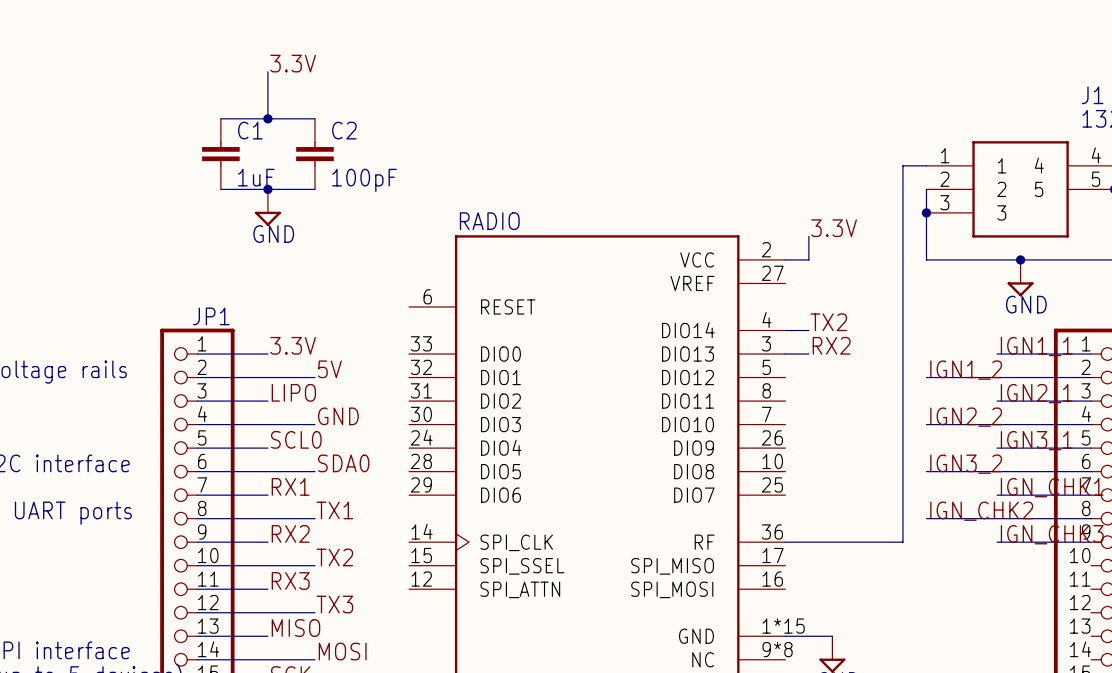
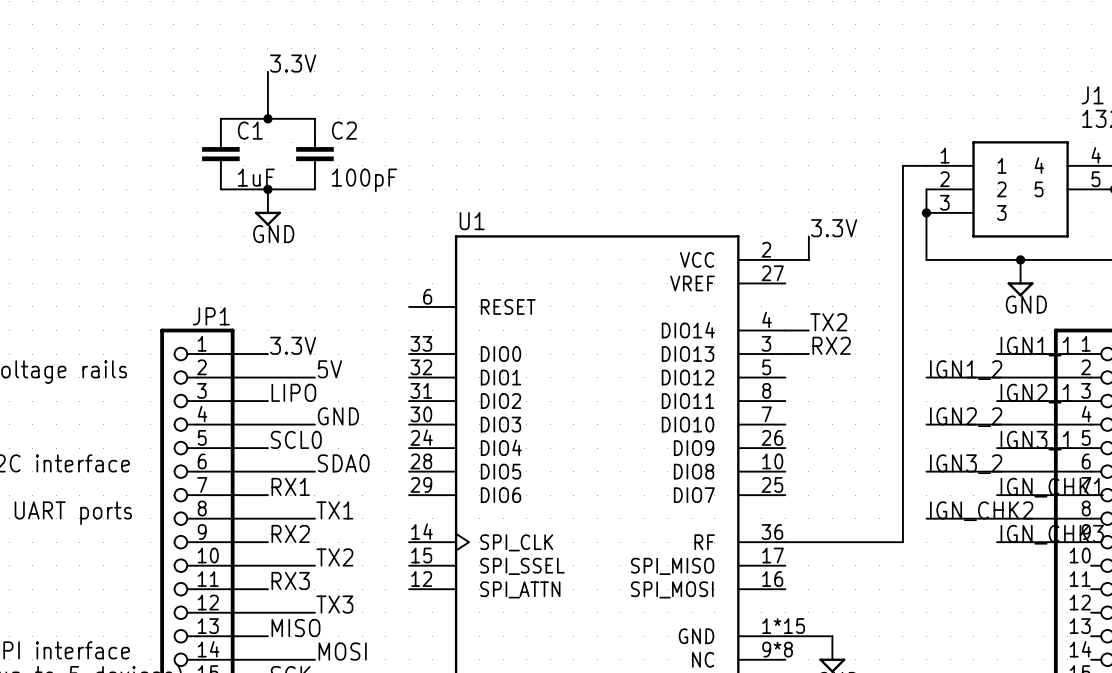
RADIO name: RADIO (489, 221) -> U1 (472, 221)

